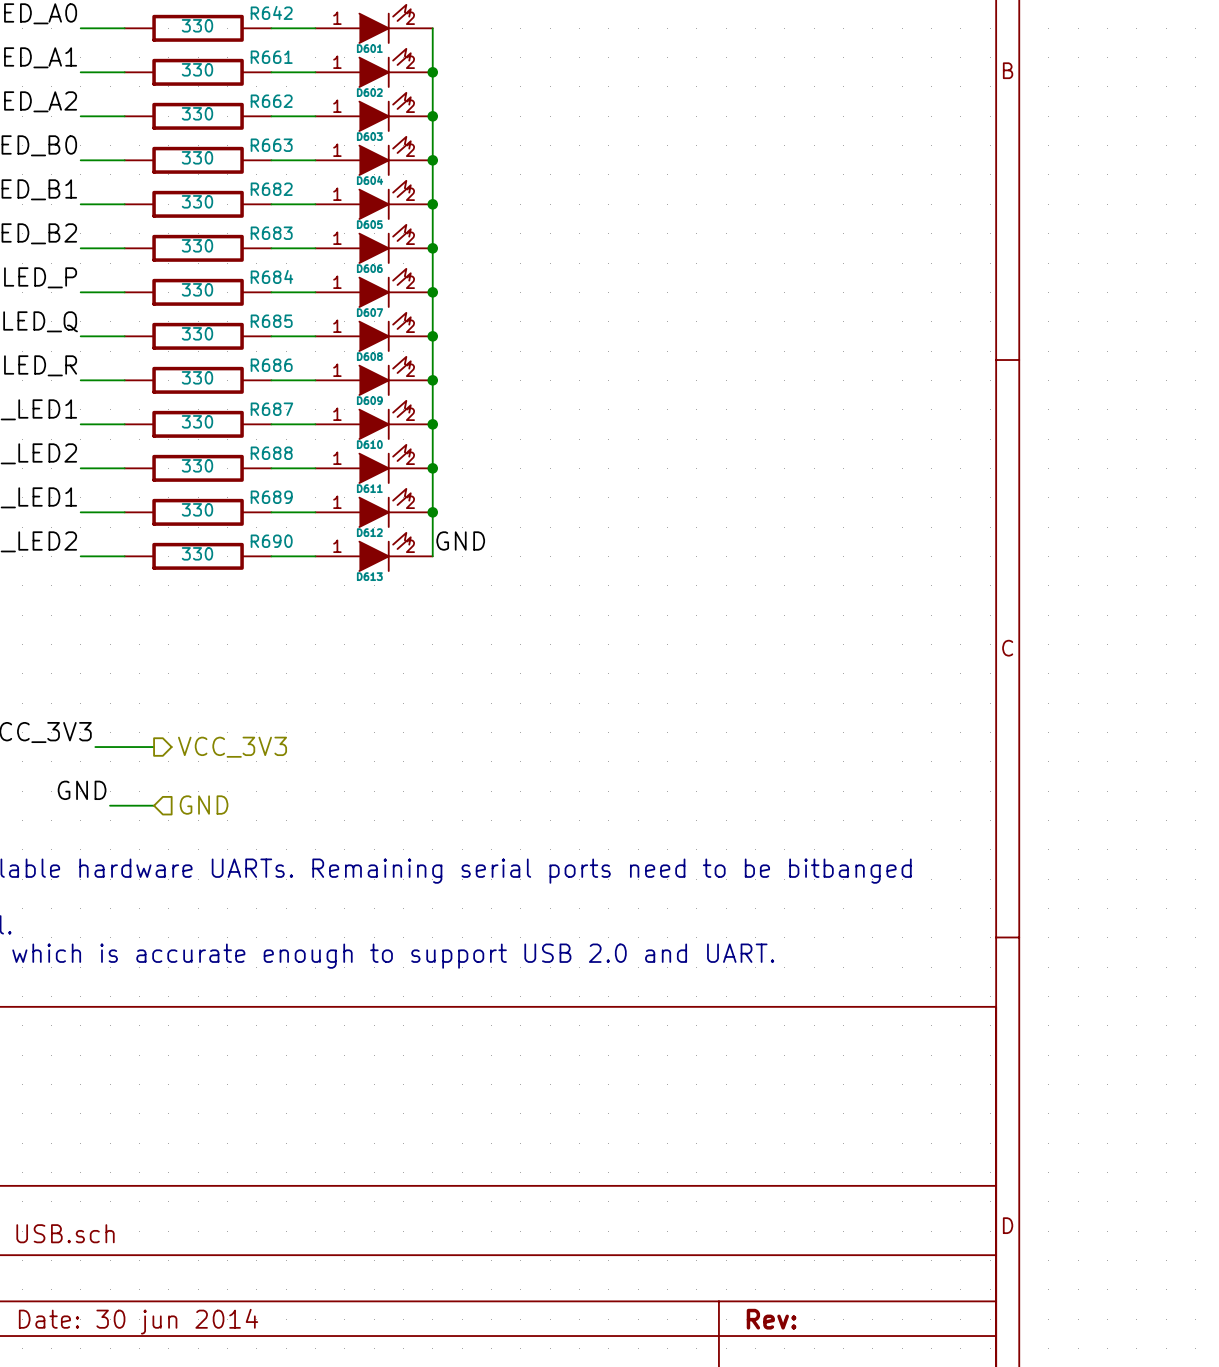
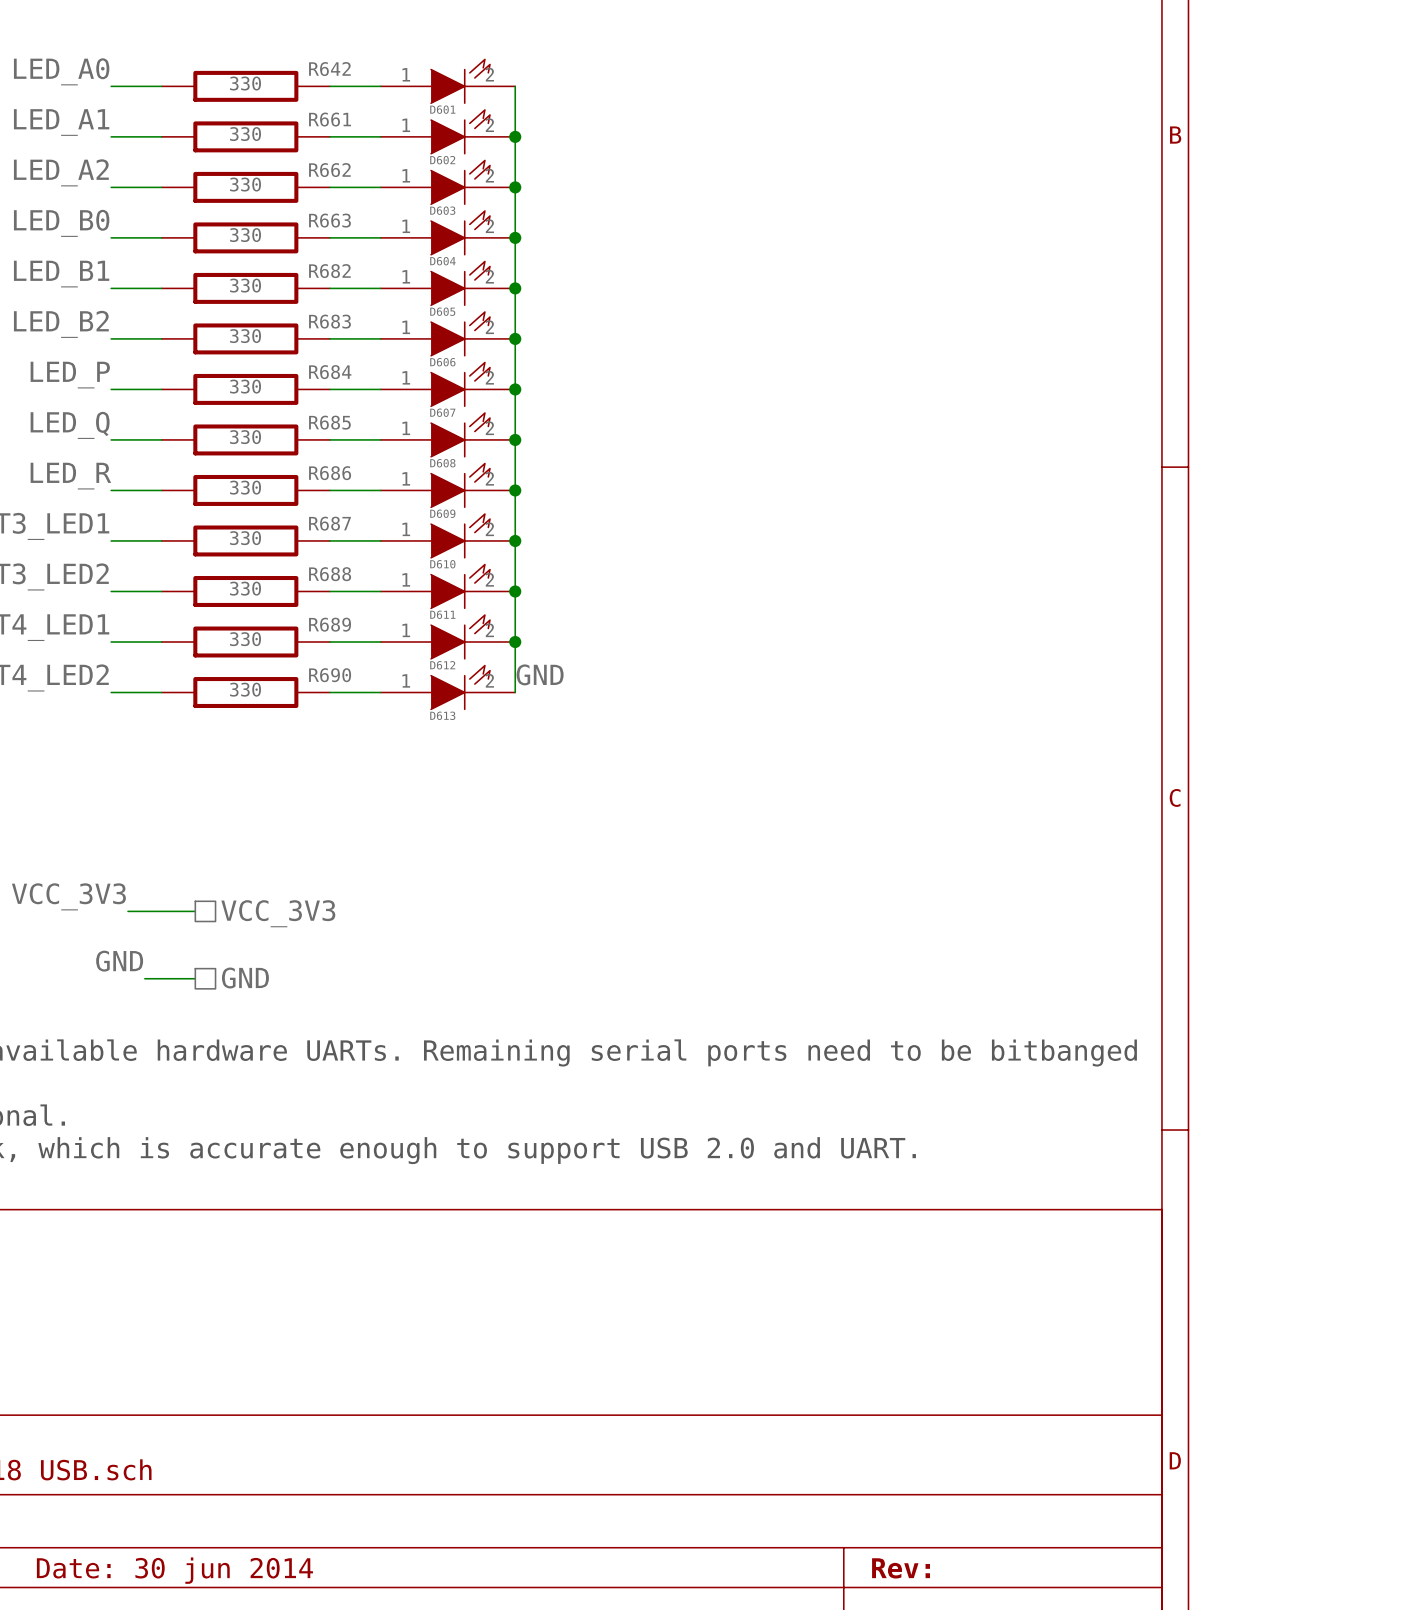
hierarchical label shape: output (232, 747) -> passive (278, 913)
hierarchical label shape: input (204, 805) -> passive (245, 978)

